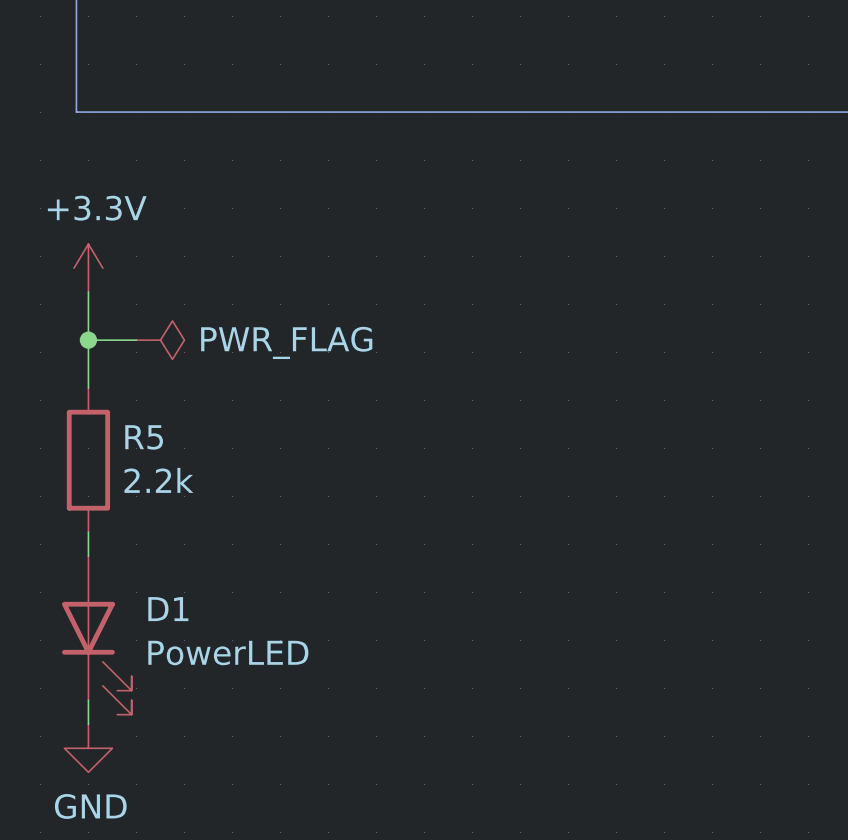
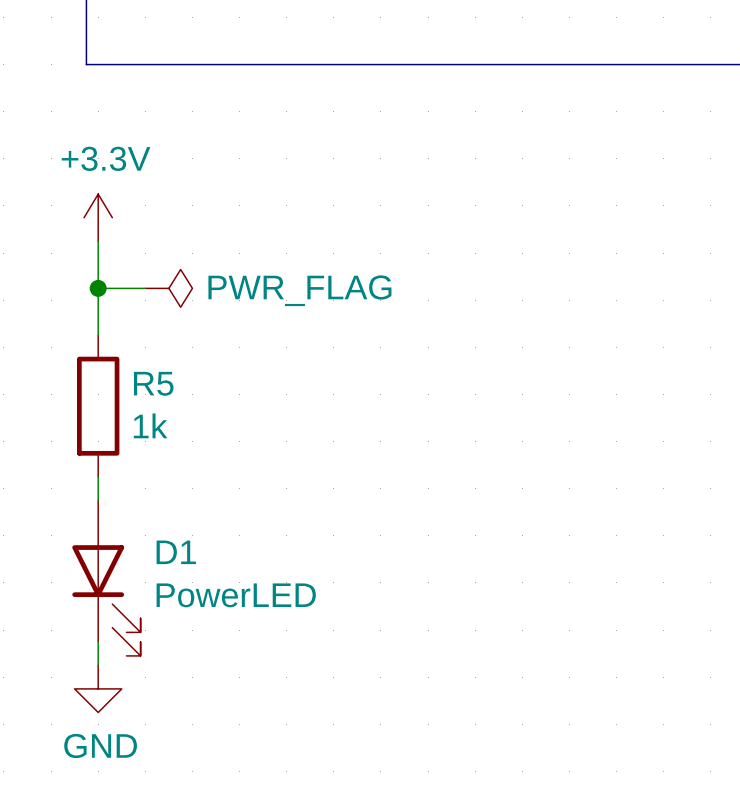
R5 value: 2.2k (158, 480) -> 1k (150, 425)

